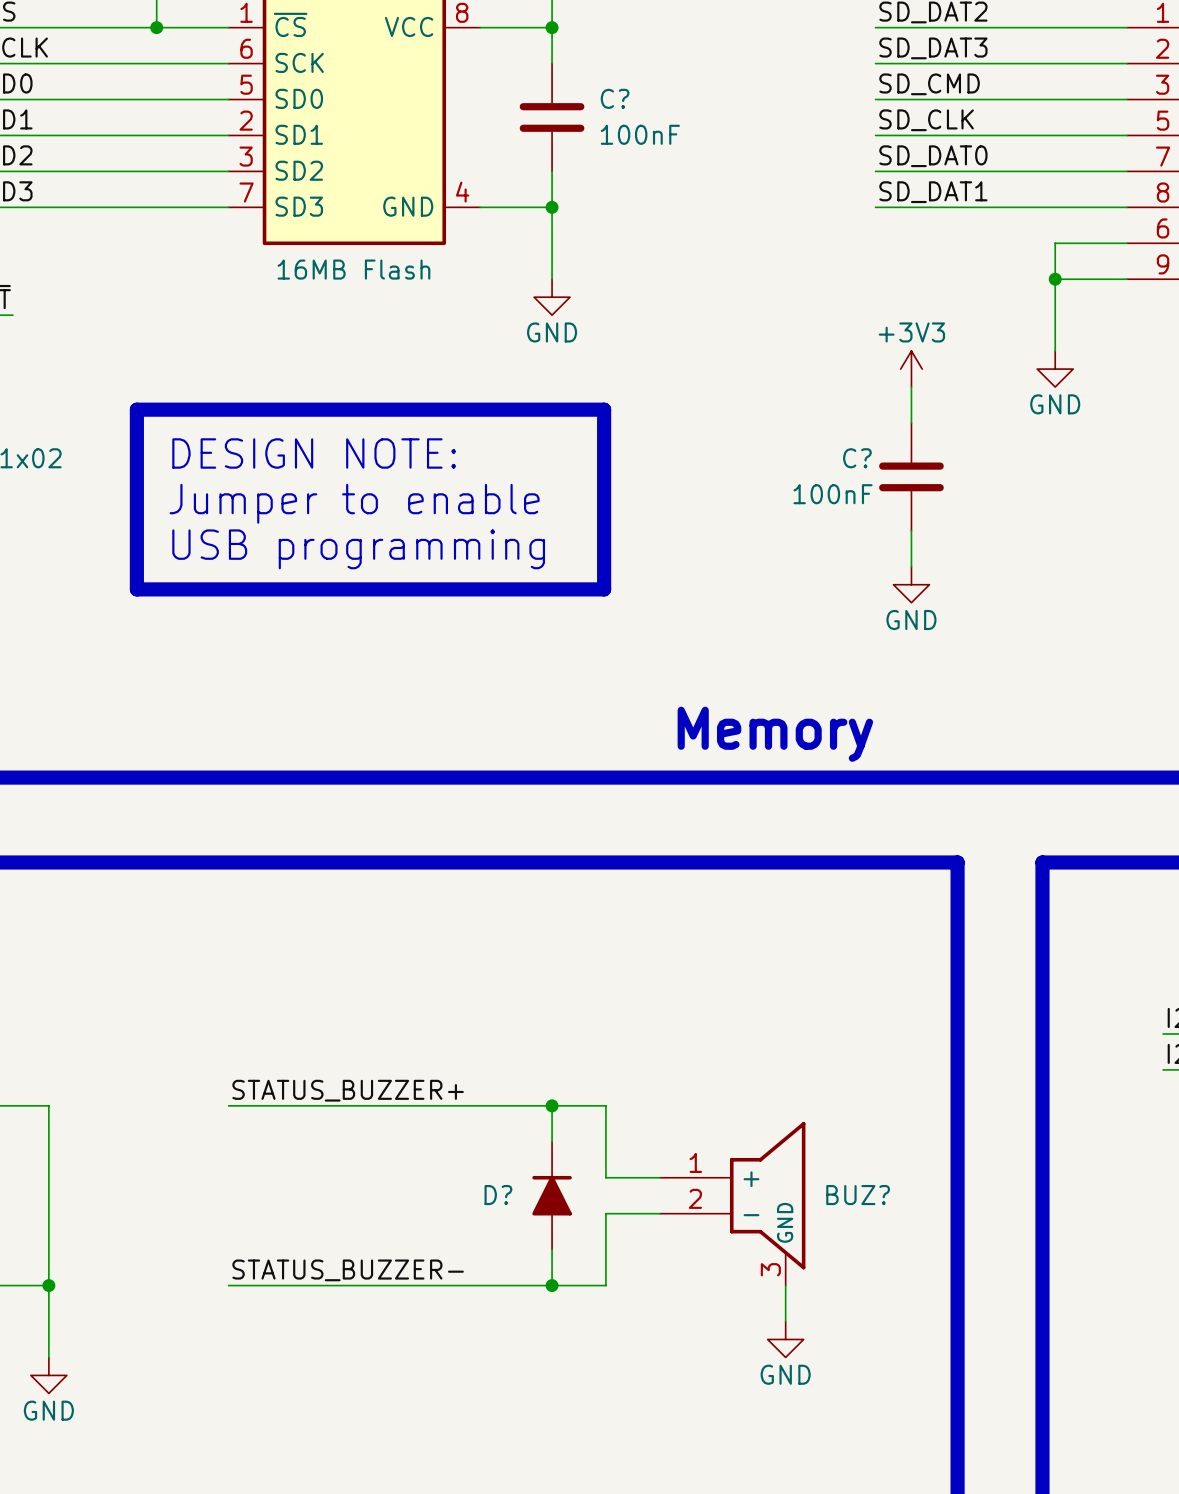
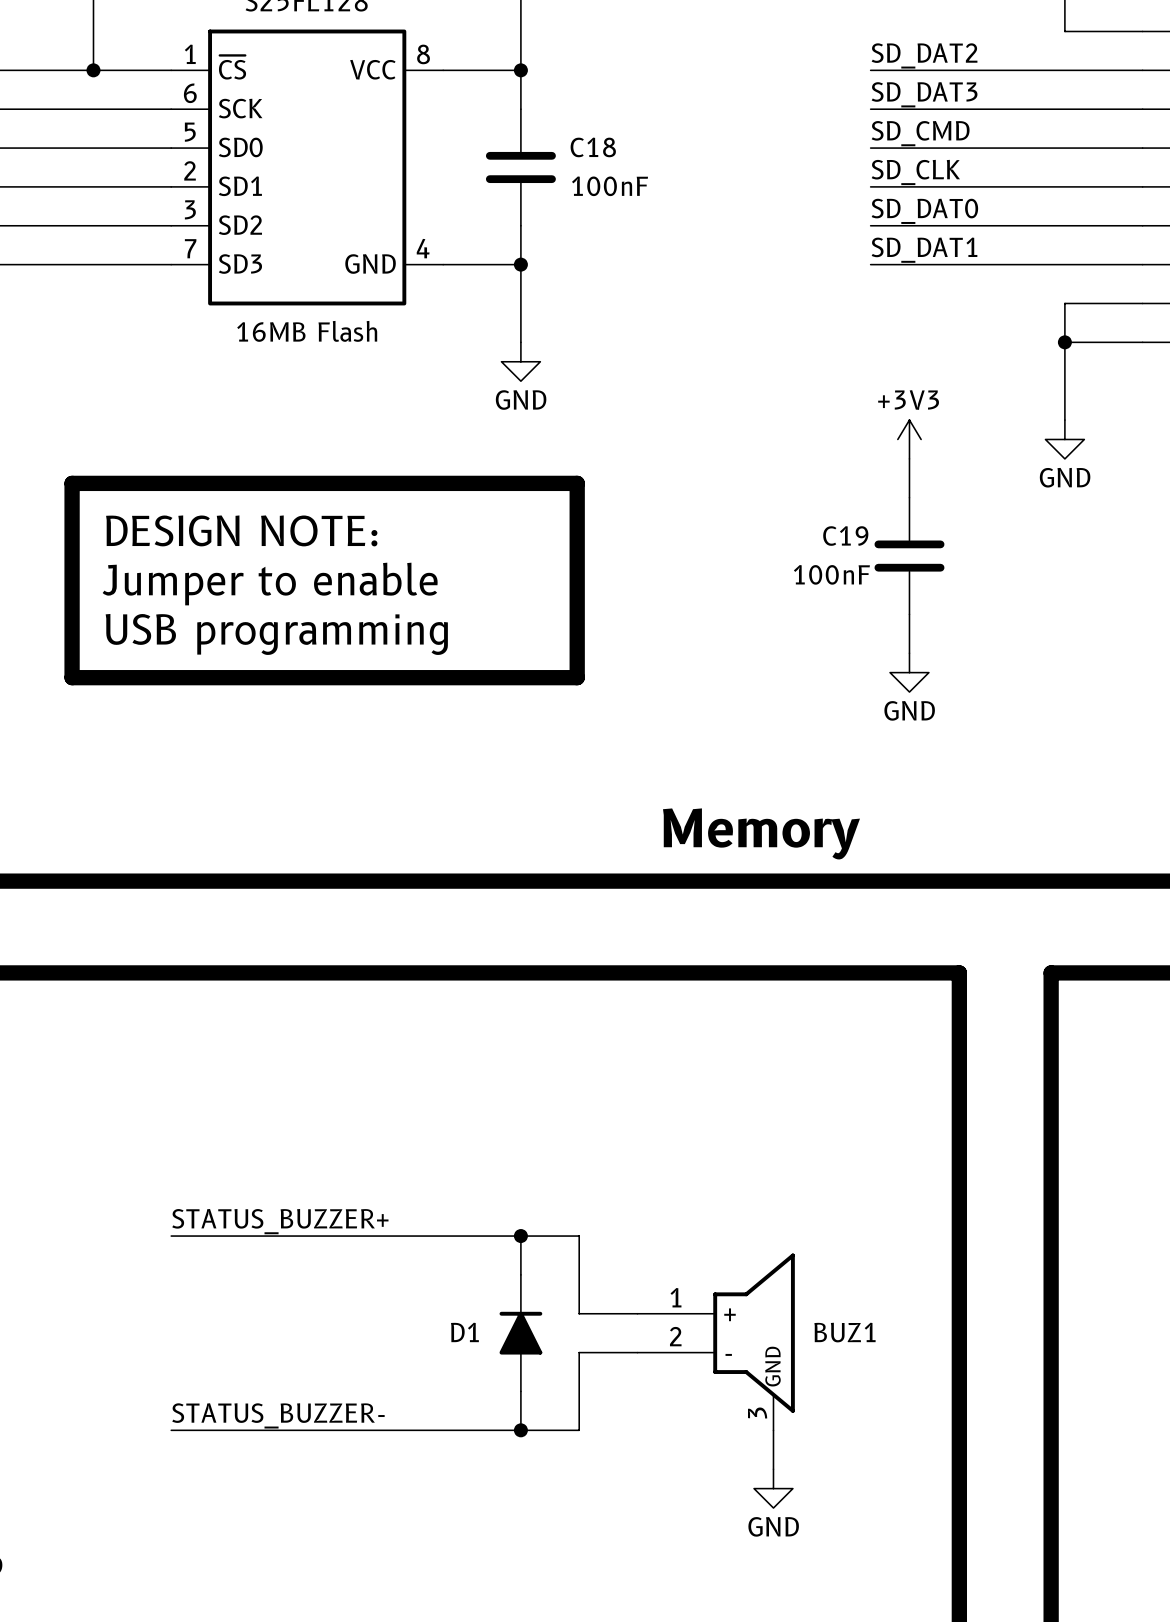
C? name: C? (615, 98) -> C18 (593, 147)
C? name: C? (857, 458) -> C19 (845, 536)
D? name: D? (498, 1195) -> D1 (464, 1332)
BUZ? name: BUZ? (858, 1195) -> BUZ1 (844, 1332)

